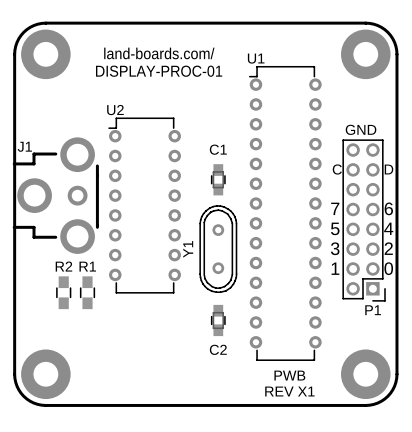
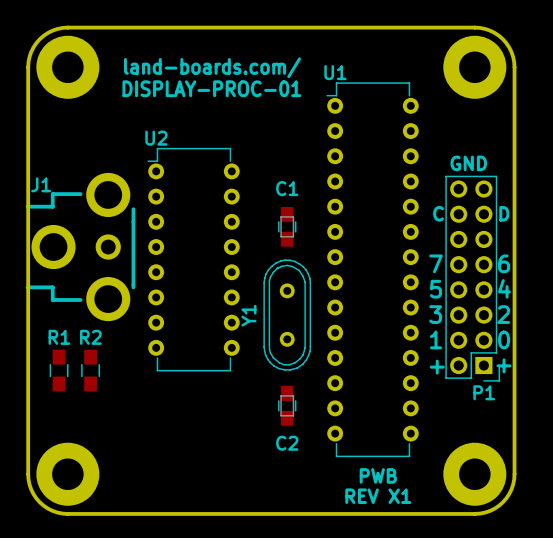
text: none -> + (504, 365)
text: none -> + (437, 367)
R1 position: (87, 292) -> (59, 370)

